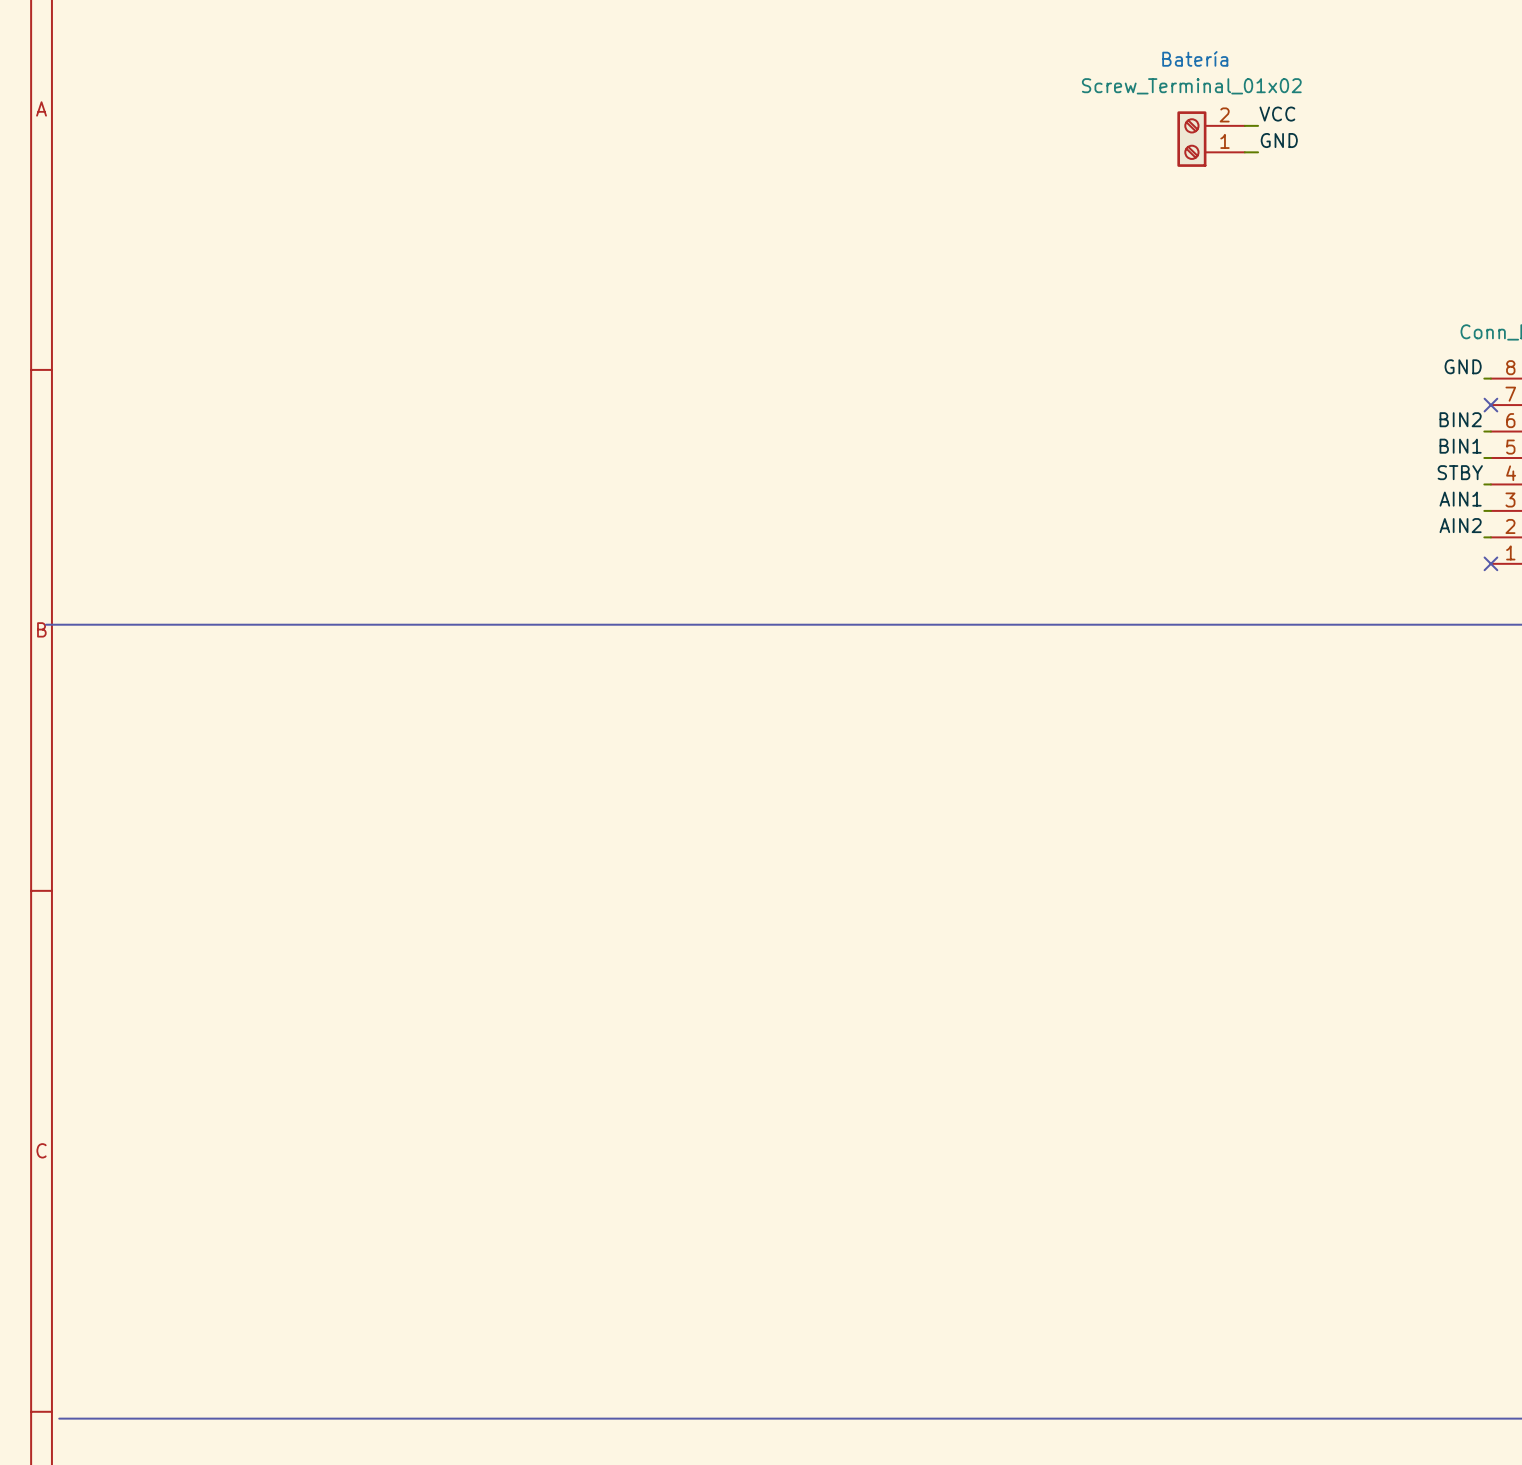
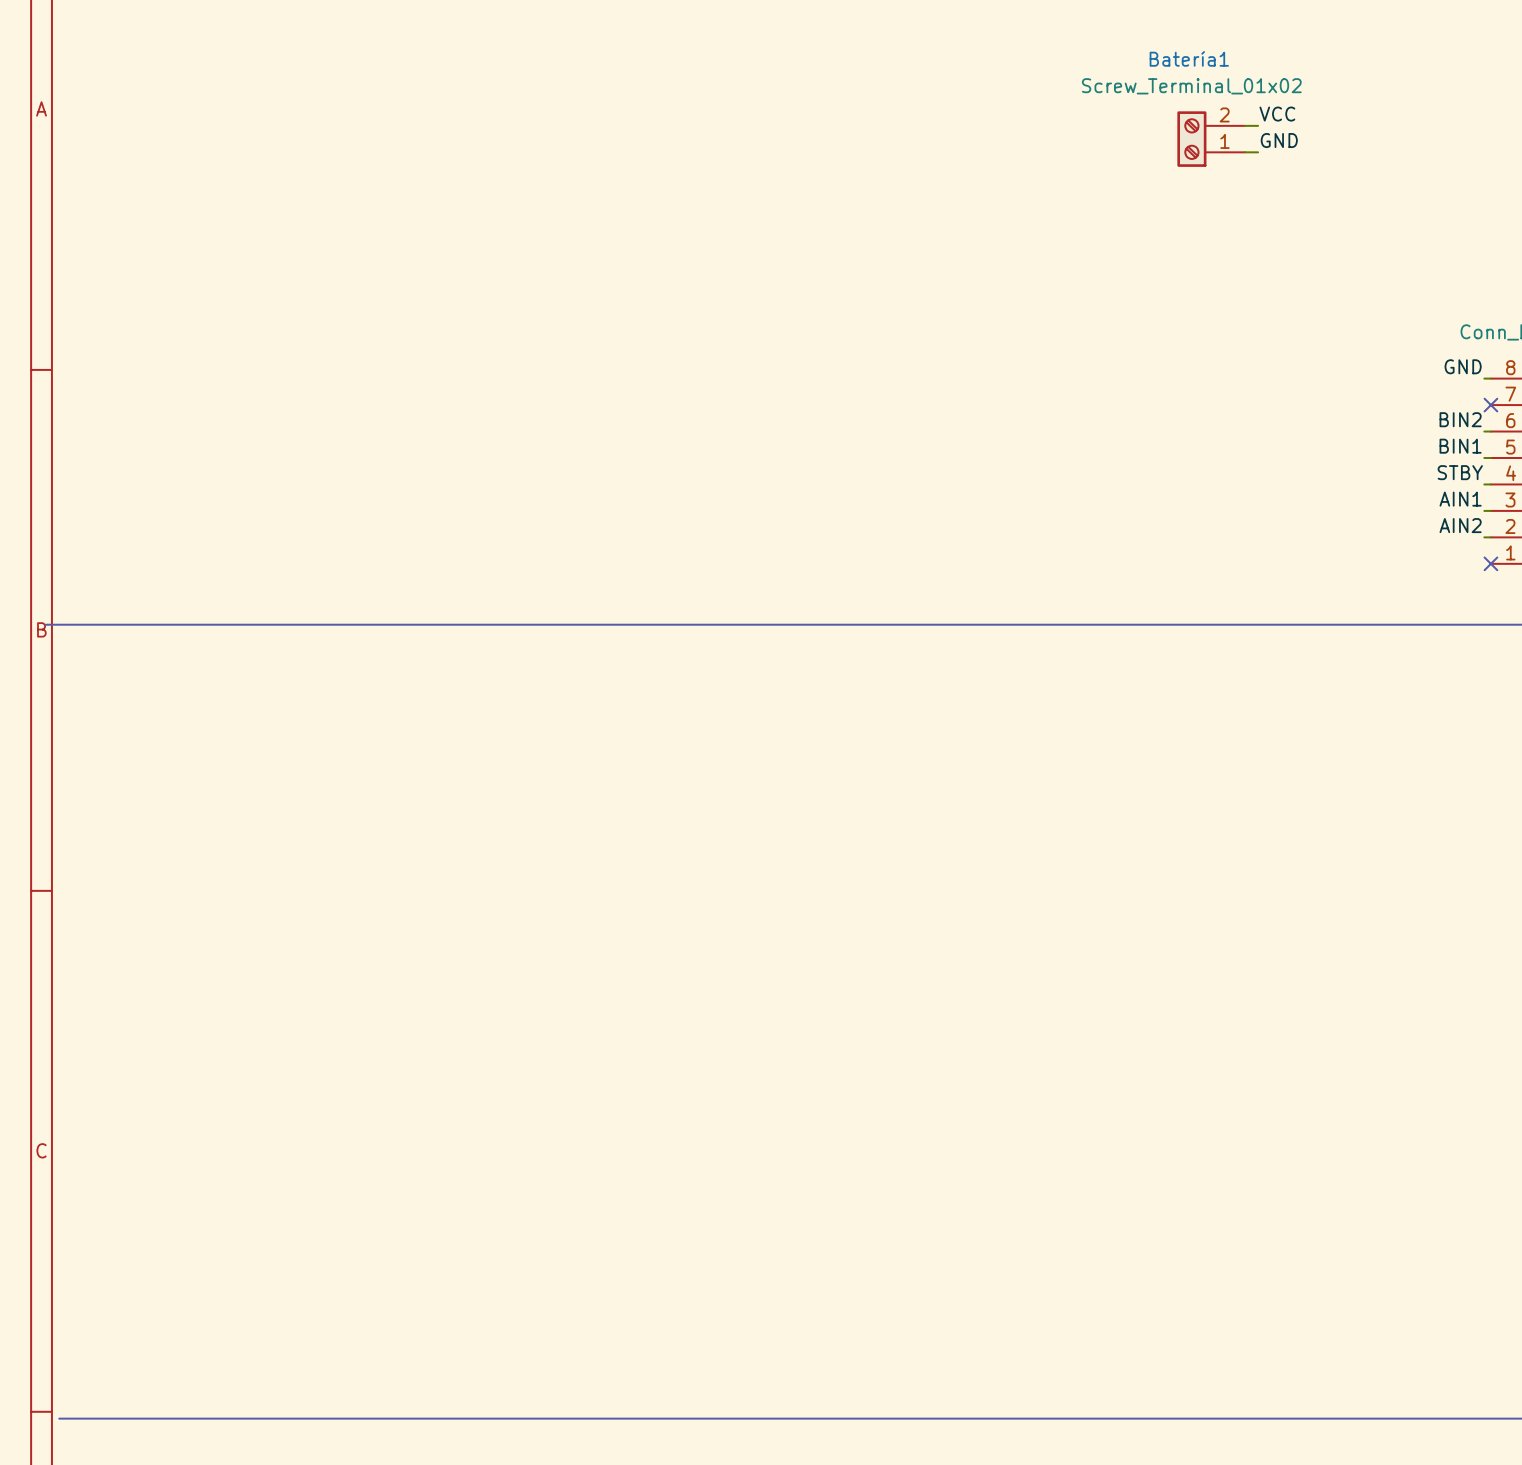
Batería name: Batería (1195, 58) -> Batería1 (1189, 58)

